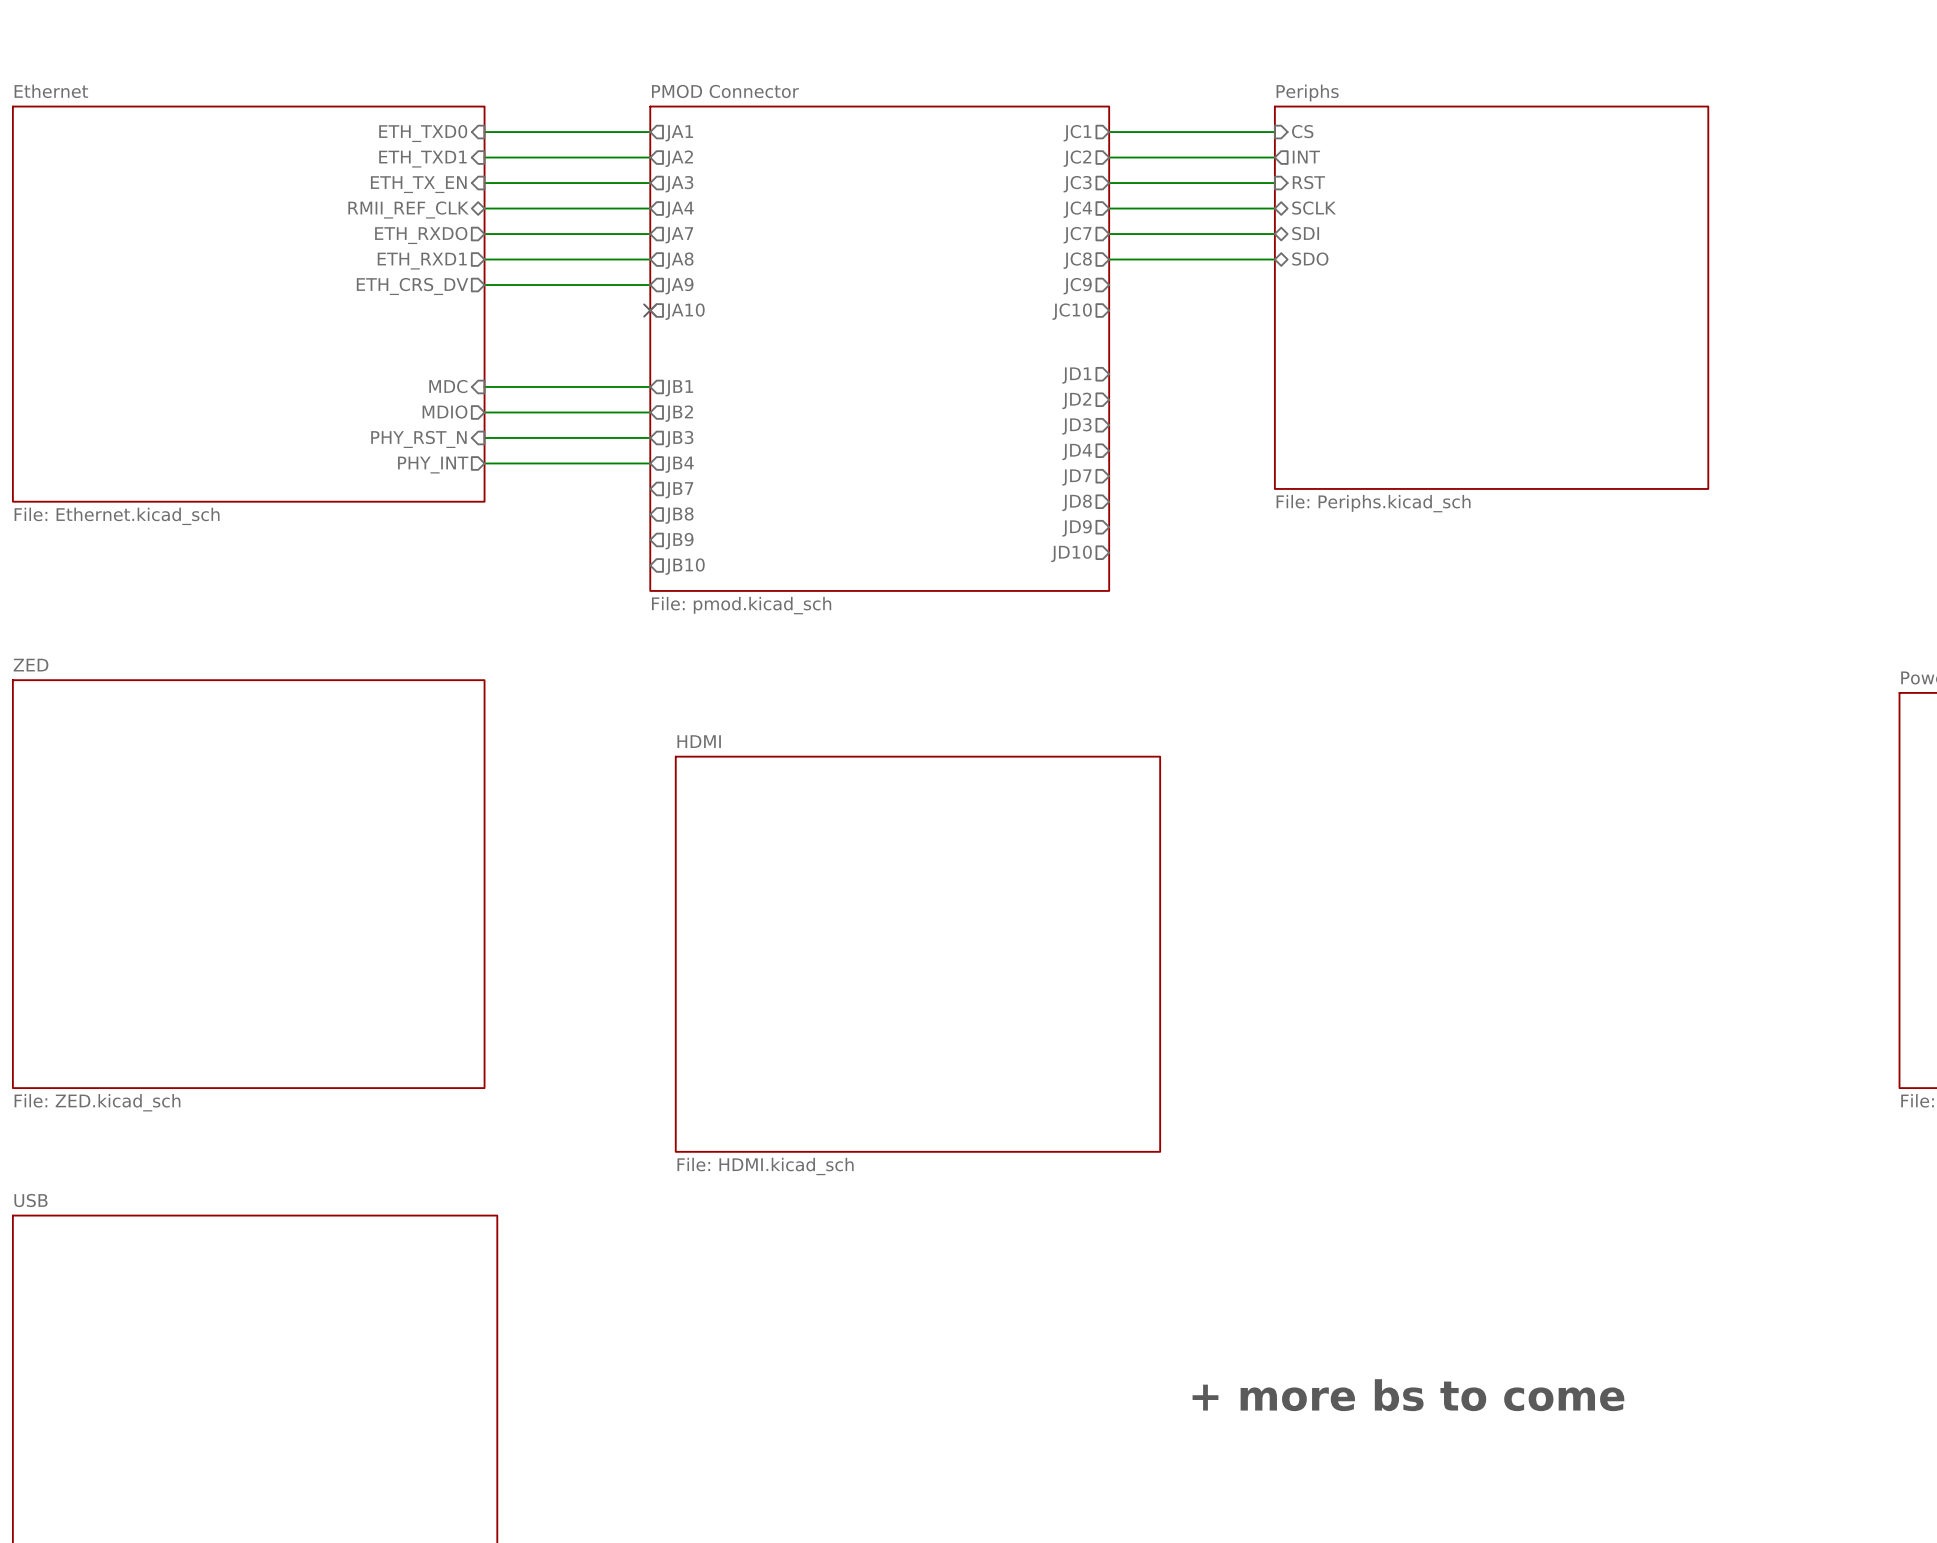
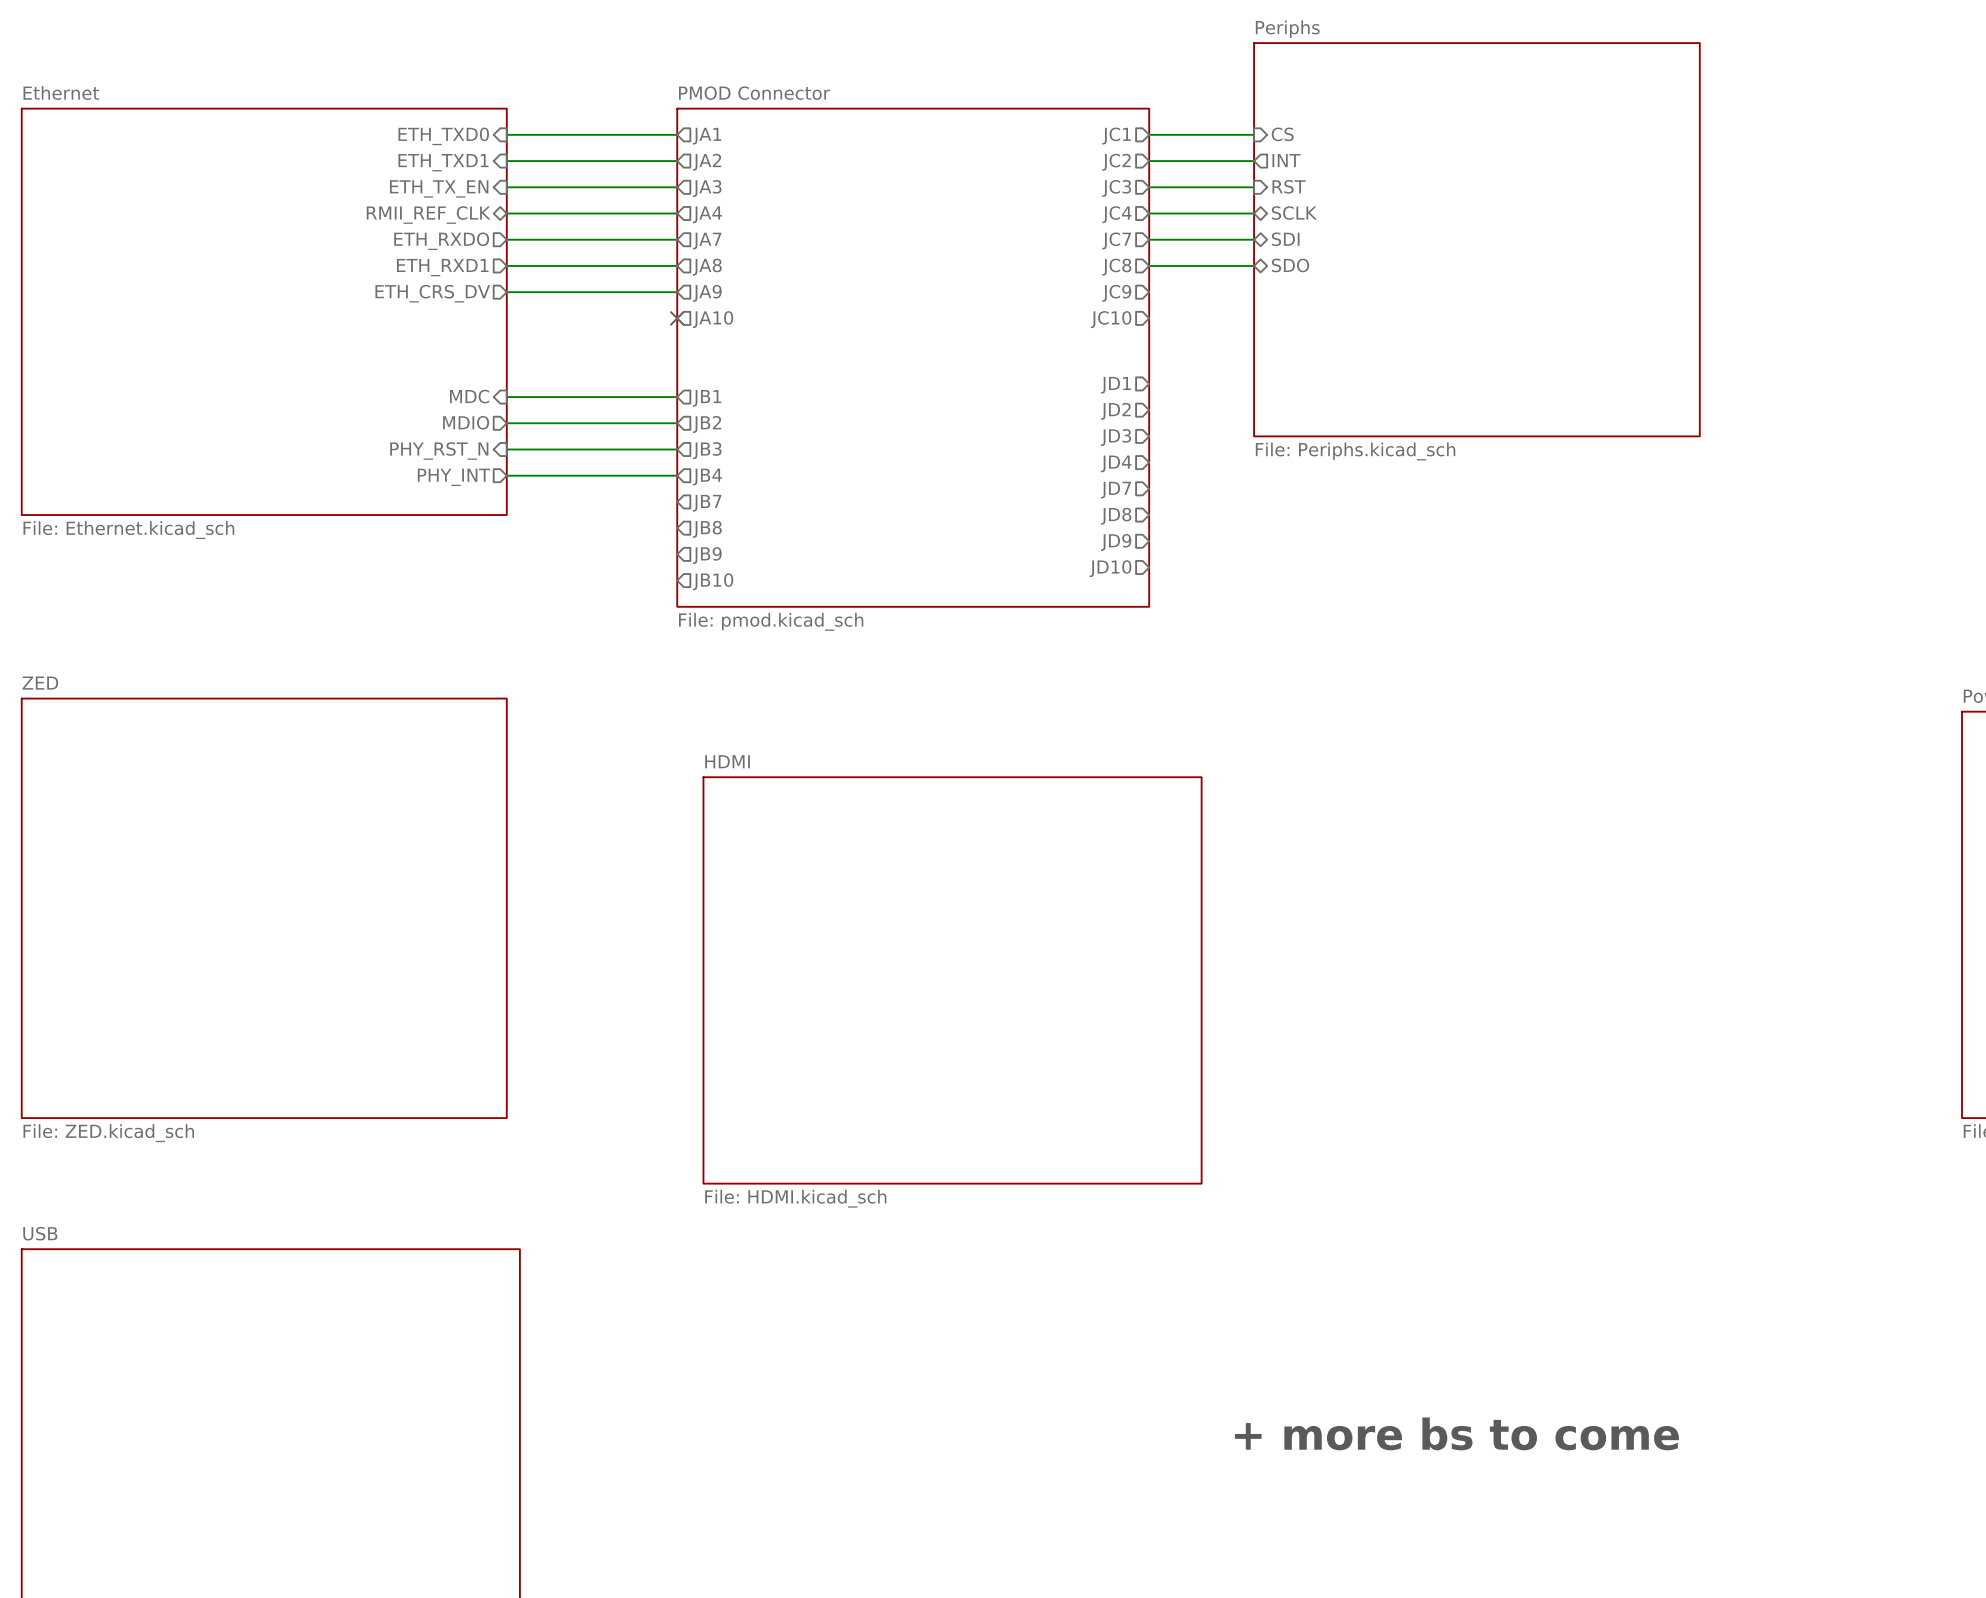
sheet pin position: CS (1302, 131) -> CS (1282, 134)
wire: (1211, 132) (1274, 132) -> none
wire: (1211, 157) (1274, 157) -> none
sheet pin position: INT (1306, 157) -> INT (1286, 160)
sheet pin position: RST (1308, 182) -> RST (1289, 186)
wire: (1211, 183) (1274, 183) -> none
wire: (1211, 208) (1274, 208) -> none
sheet pin position: SCLK (1314, 208) -> SCLK (1294, 213)
sheet pin position: SDI (1305, 233) -> SDI (1285, 239)
wire: (1211, 234) (1274, 234) -> none
wire: (1211, 259) (1274, 259) -> none
sheet pin position: SDO (1310, 259) -> SDO (1290, 265)
sheet Periphs position: (1491, 297) -> (1476, 239)

